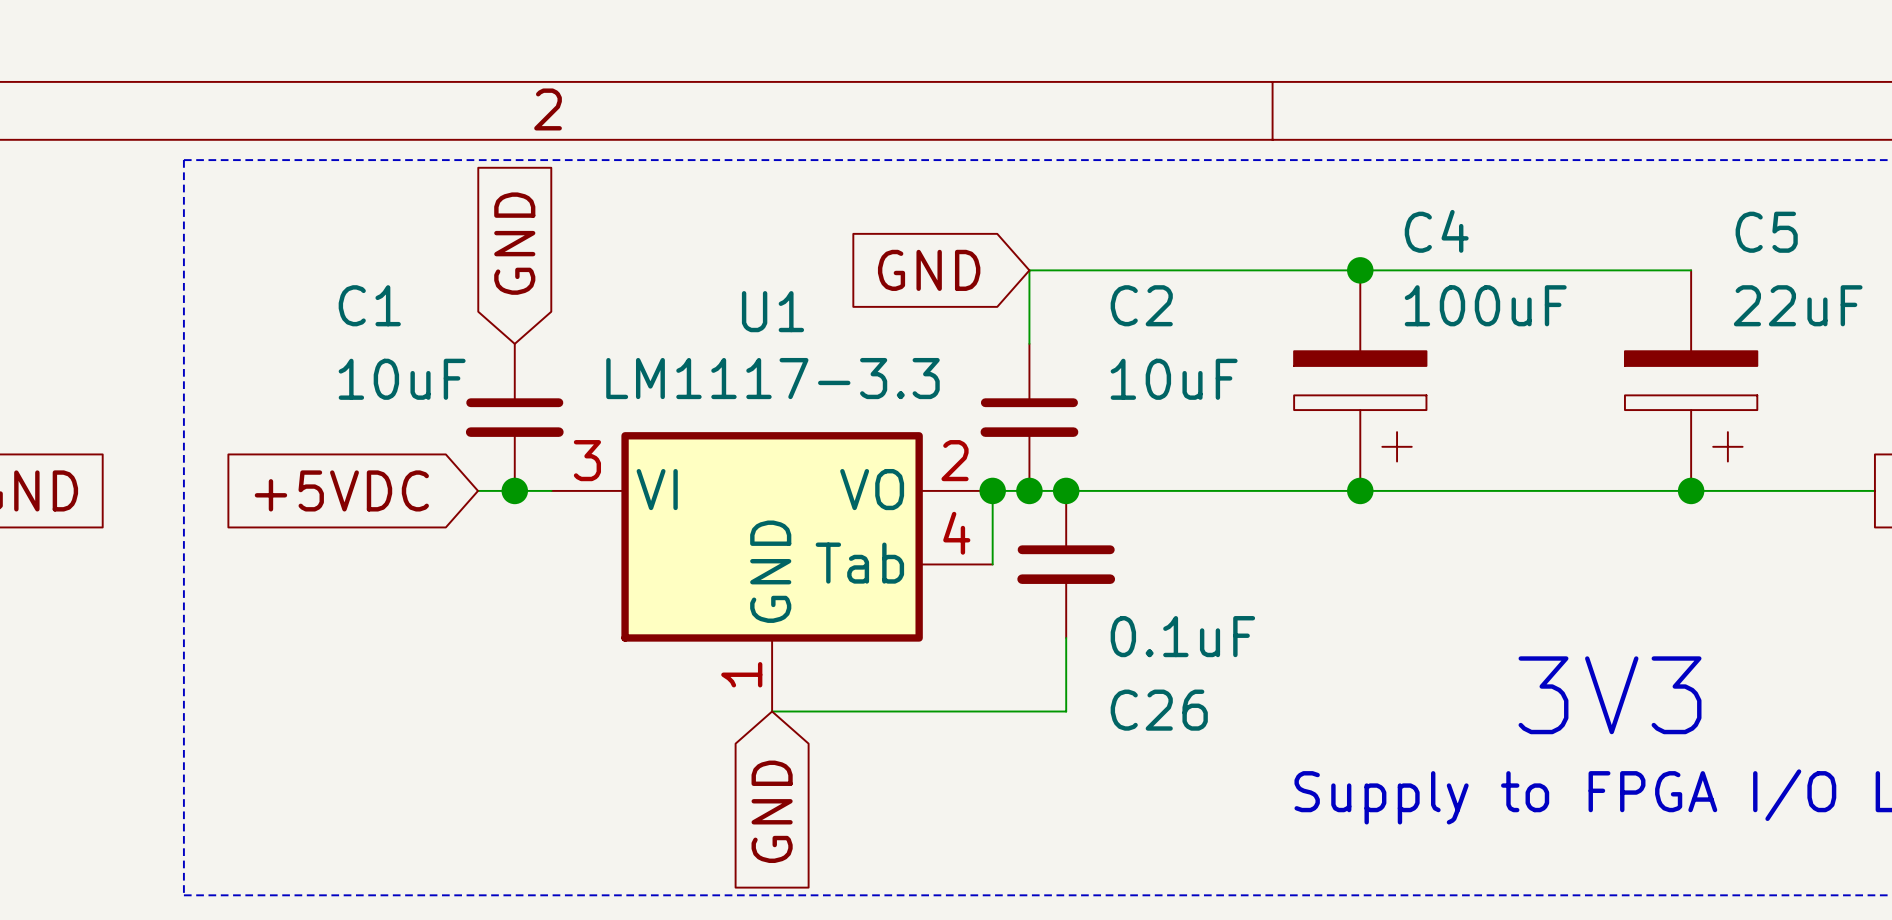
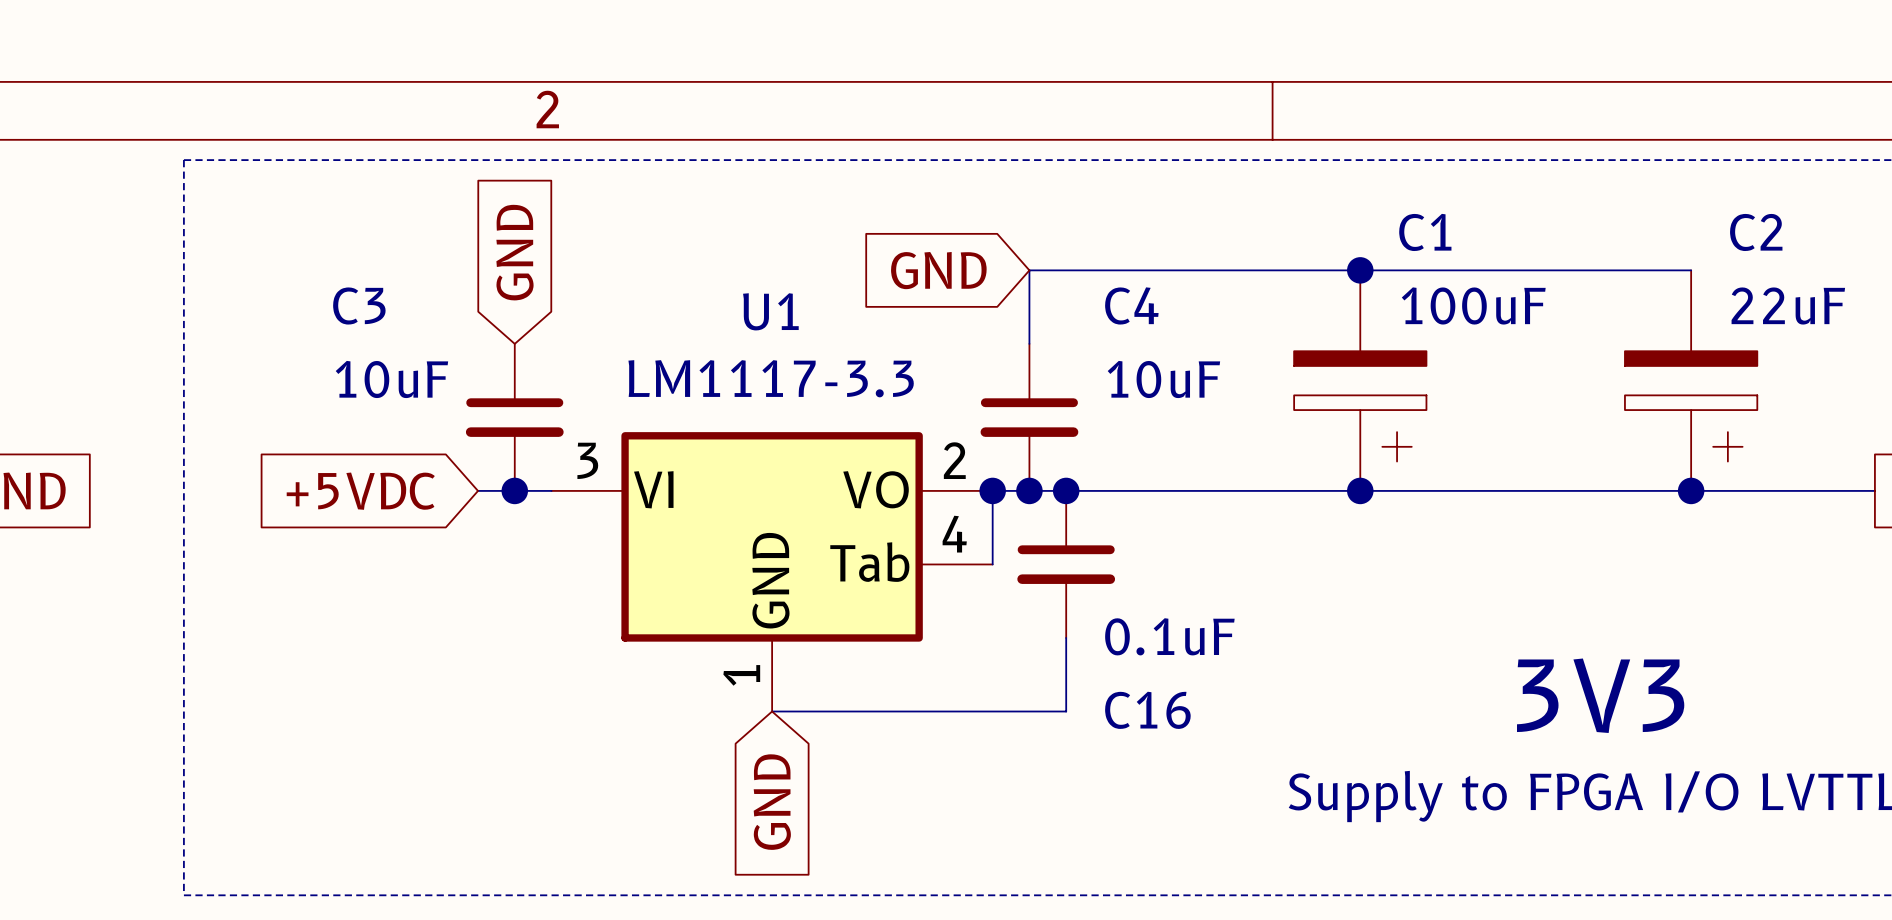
C4 name: C4 (1436, 231) -> C1 (1425, 232)
C5 name: C5 (1766, 232) -> C2 (1756, 232)
C1 name: C1 (369, 305) -> C3 (359, 306)
C2 name: C2 (1141, 305) -> C4 (1131, 305)
C26 name: C26 (1159, 710) -> C16 (1147, 710)

